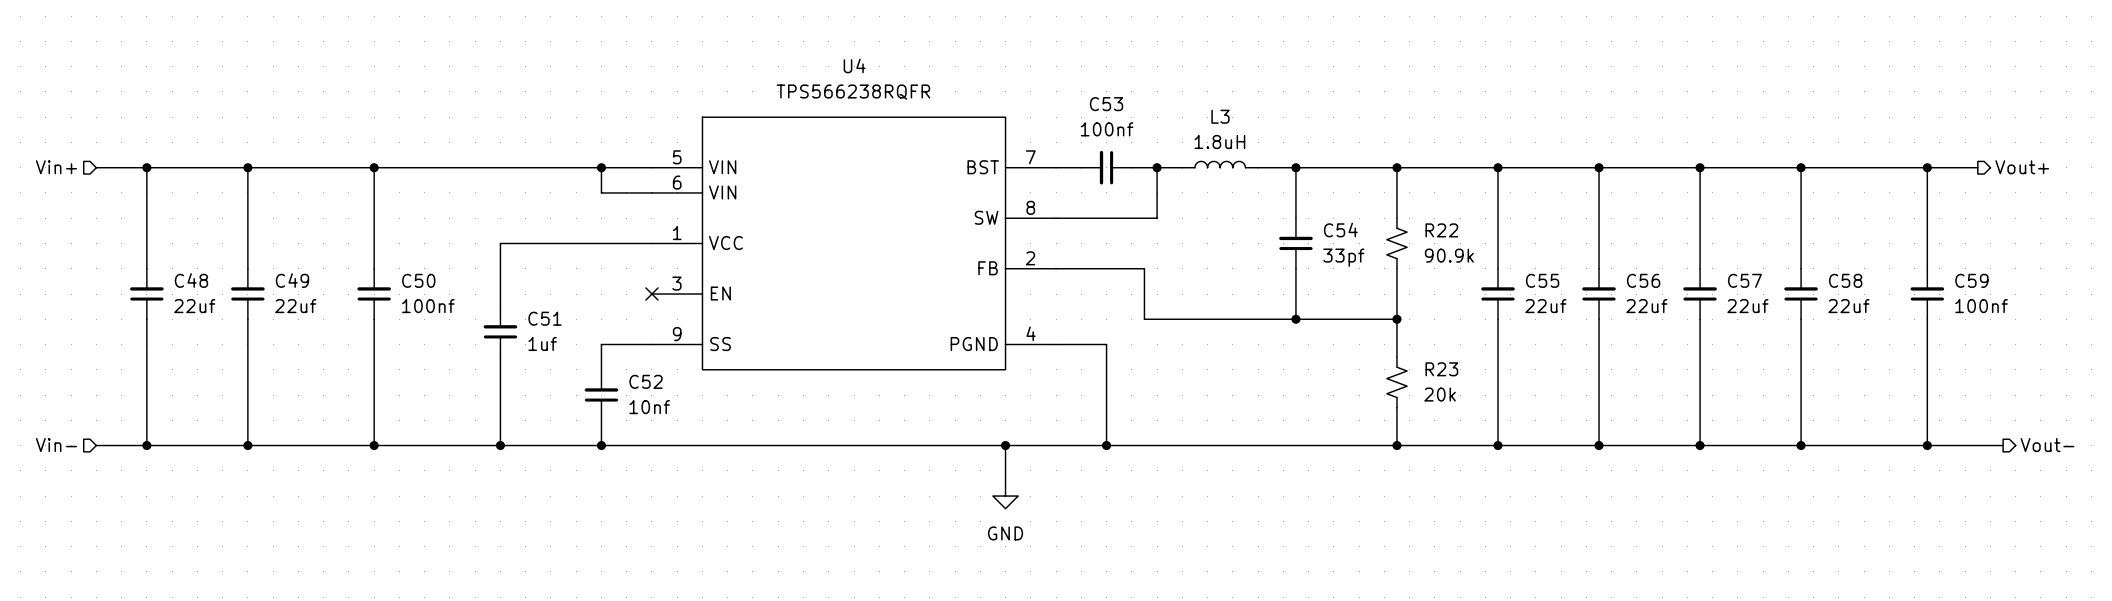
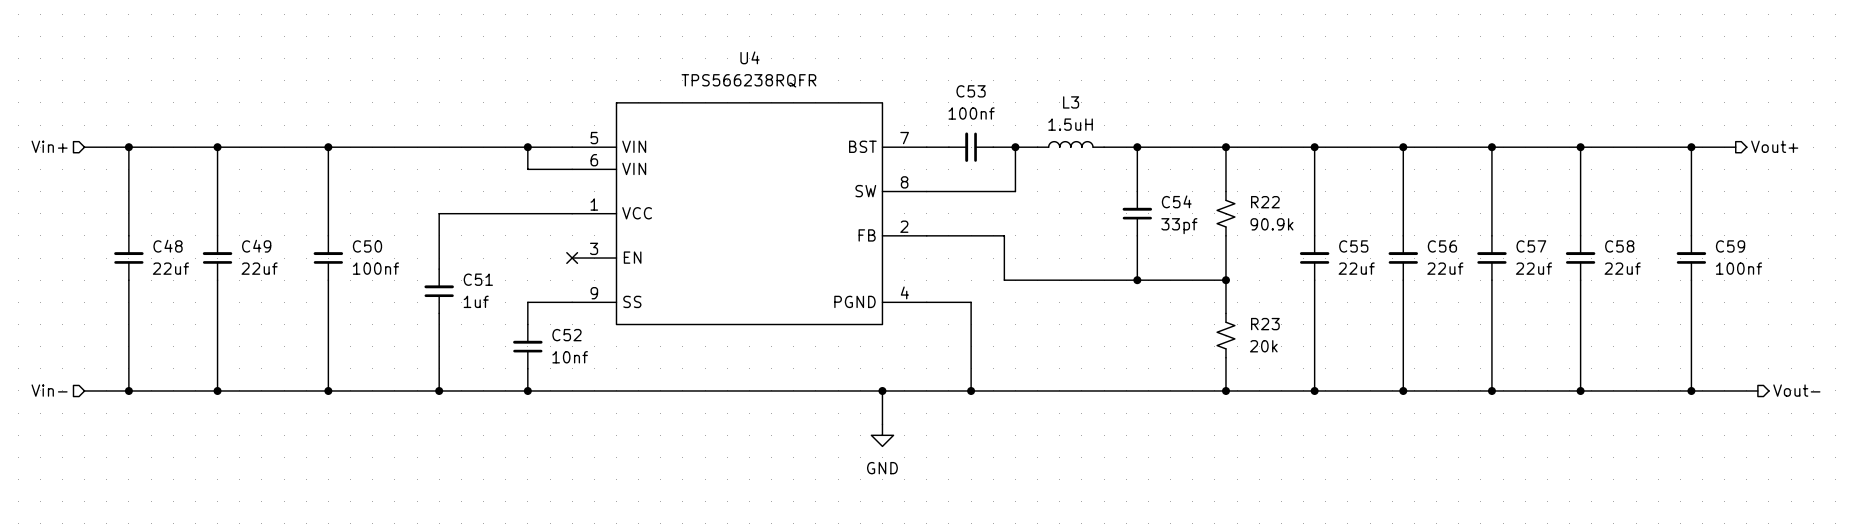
L3 value: 1.8uH (1219, 142) -> 1.5uH (1070, 124)

